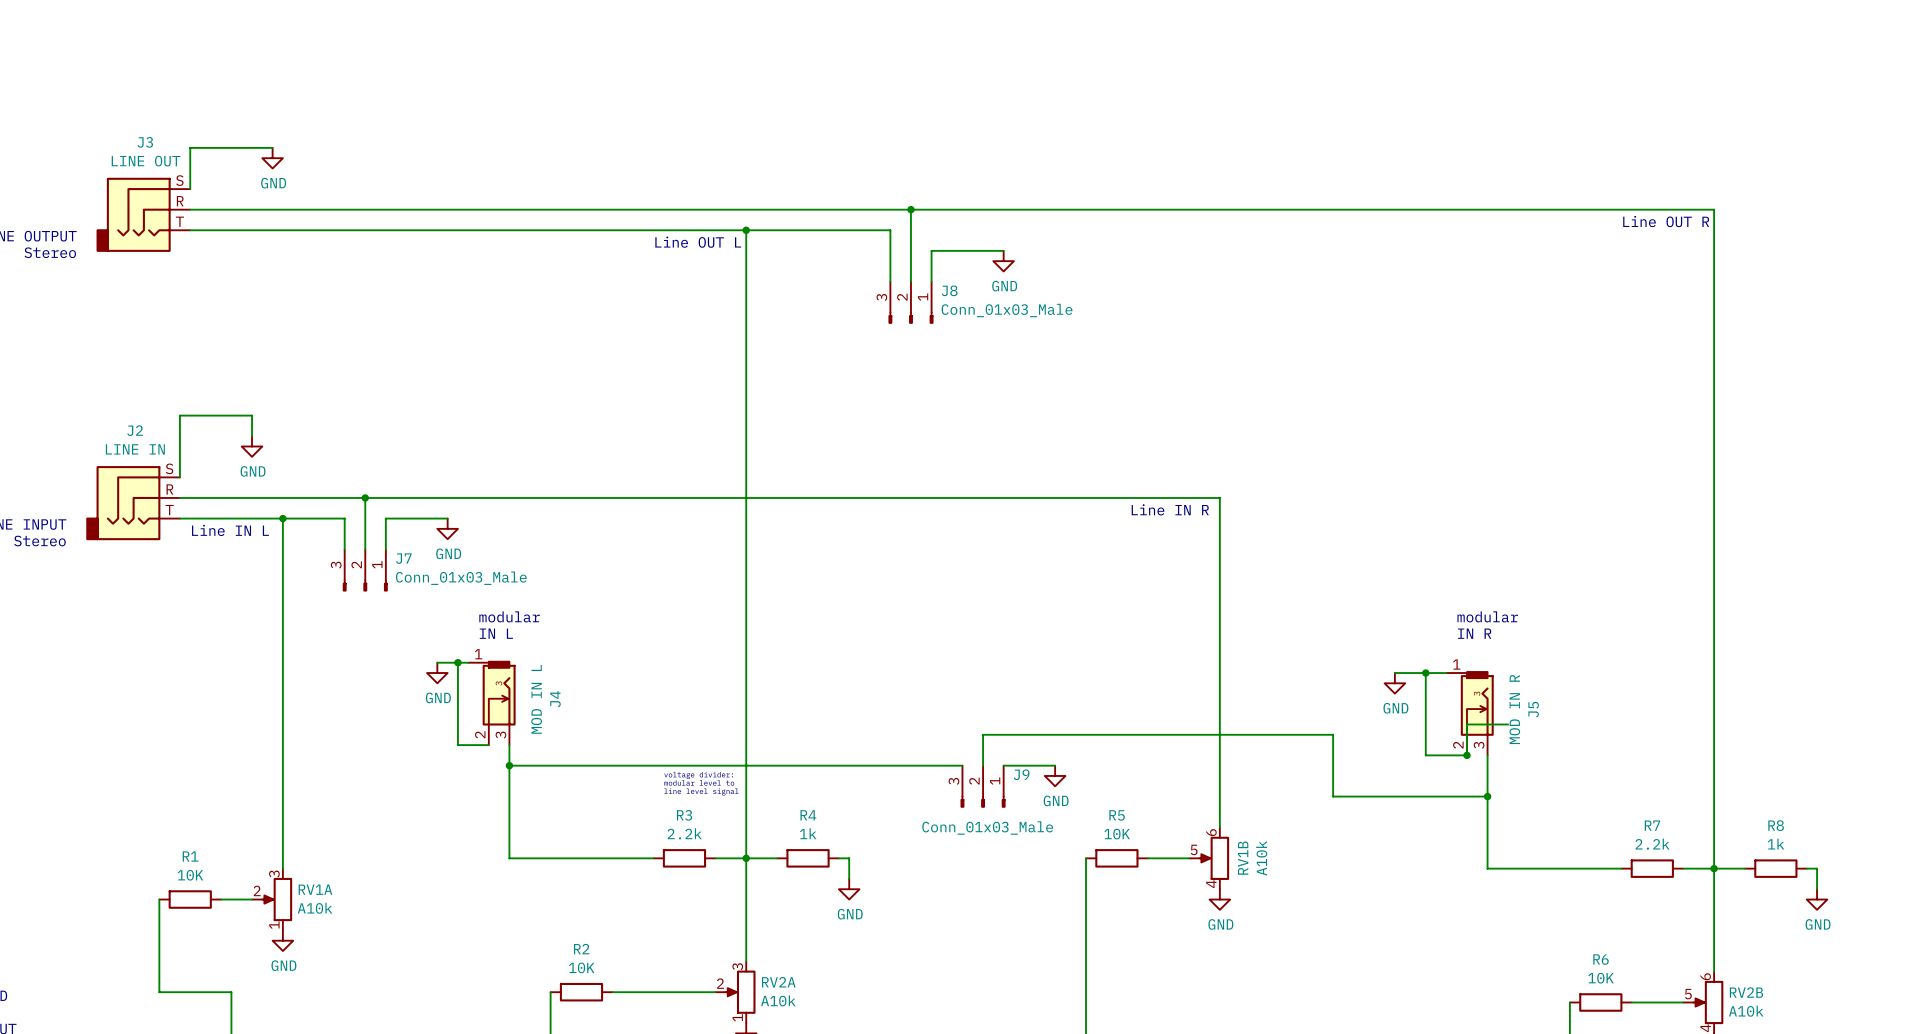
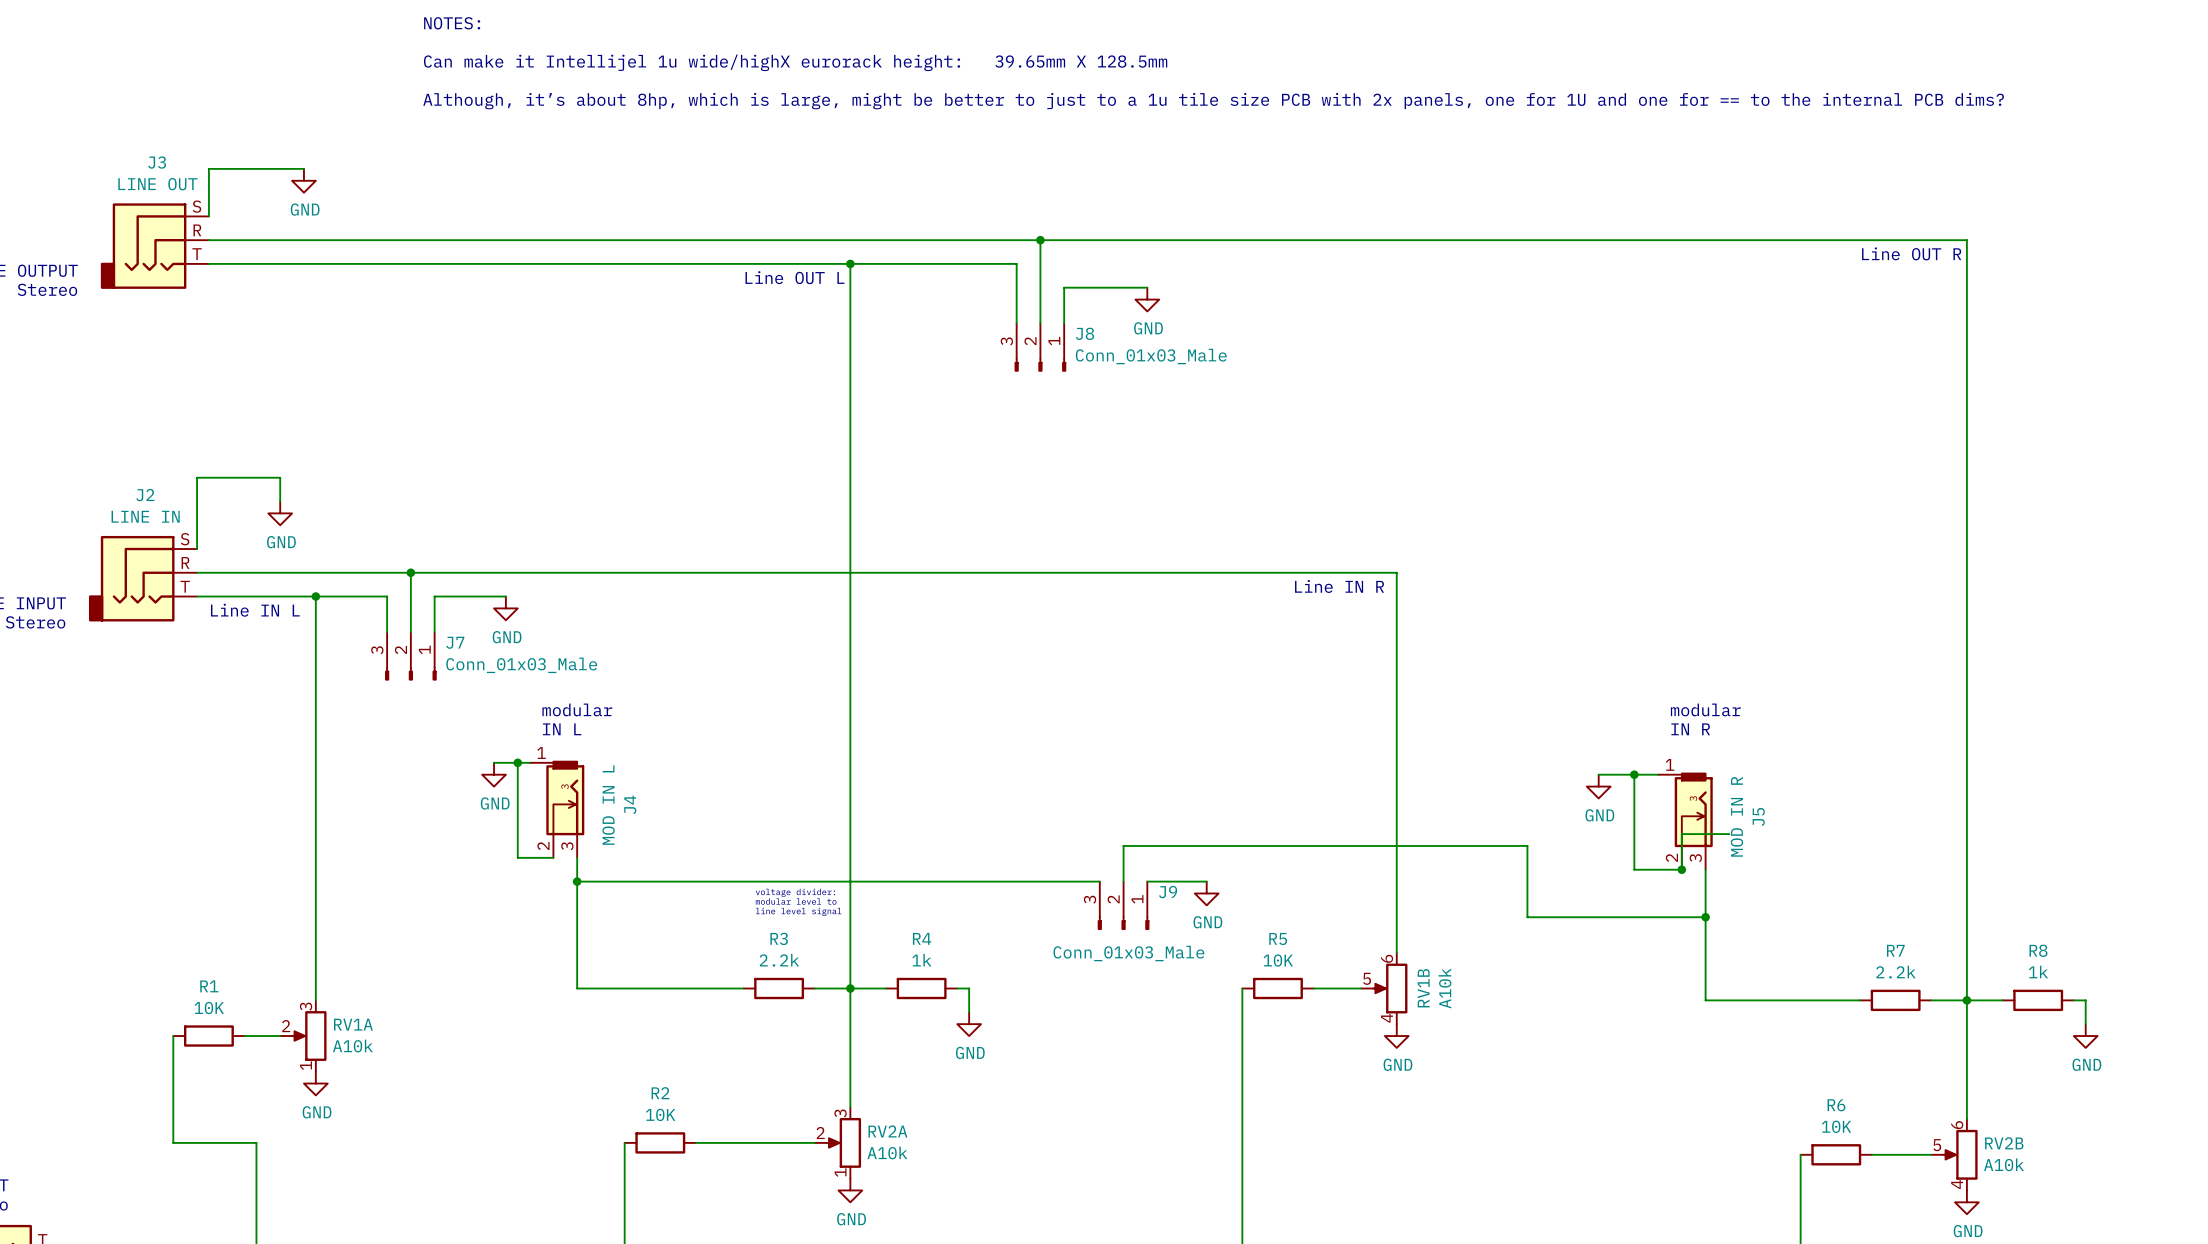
text: none -> NOTES: (452, 23)
text: none -> Can make it Intellijel 1u wide/highX eurorack height: 39.65mm X 128.5mm (795, 62)
text: none -> Although, it’s about 8hp, which is large, might be better to just to a 1u tile size PCB with 2x panels, one for 1U and one for == to the internal PCB dims? (1213, 101)

